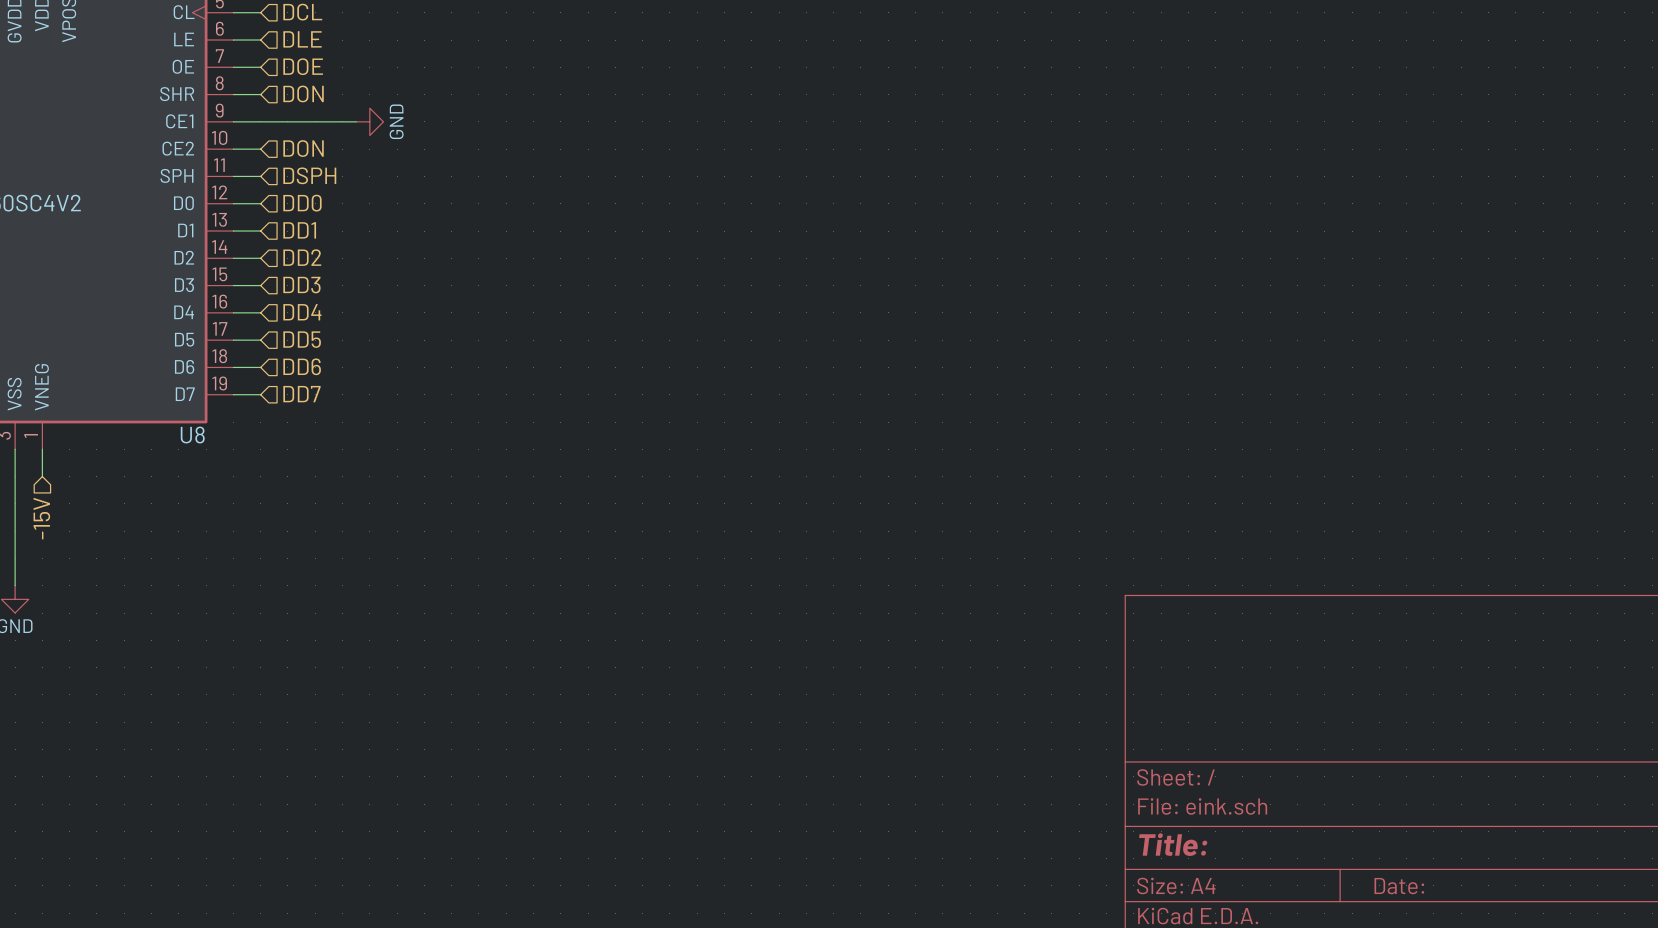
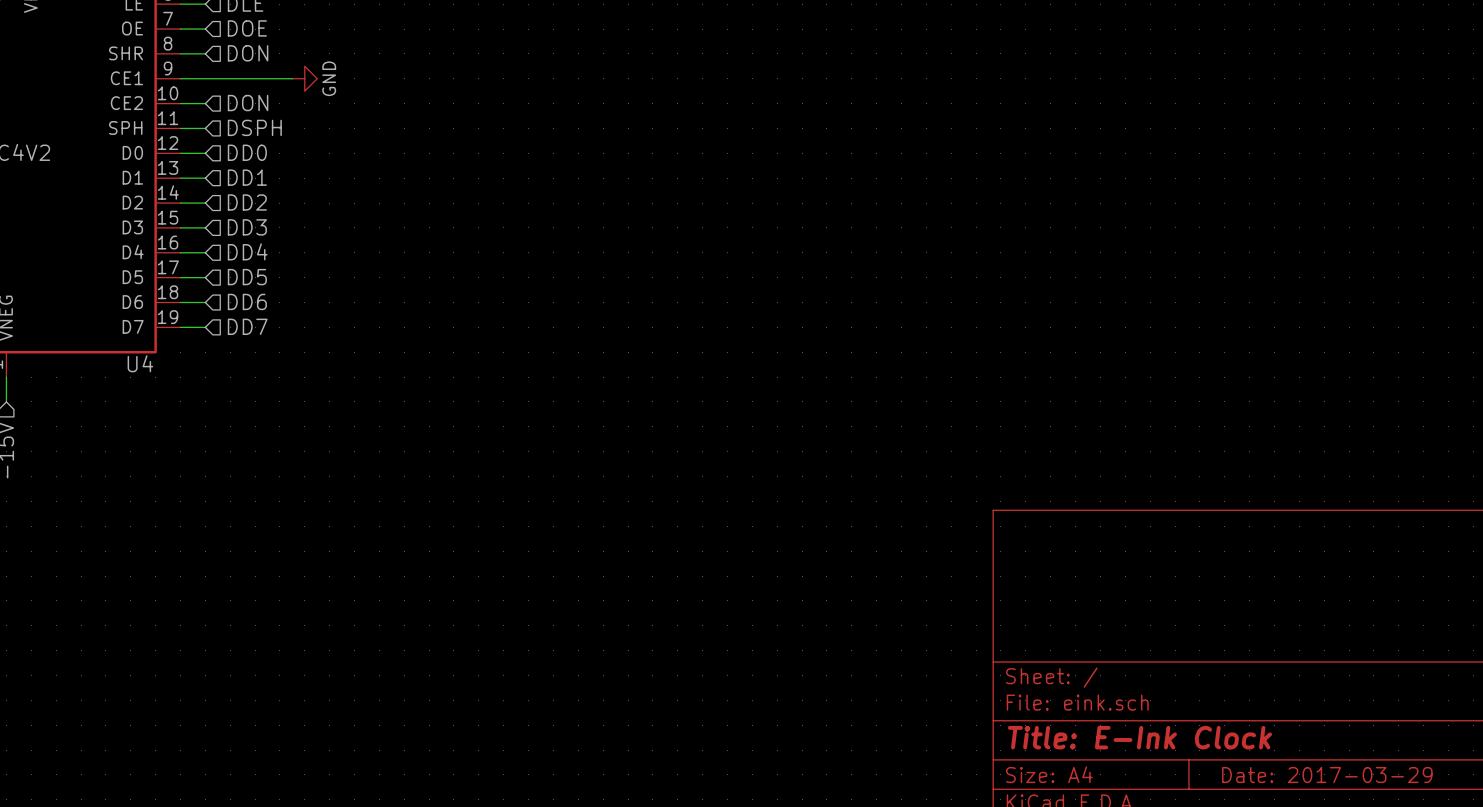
U8 name: U8 (192, 435) -> U4 (140, 363)
title block: Title: (1173, 844) -> Title: E-Ink Clock (1139, 737)
title block: Date: (1399, 886) -> Date: 2017-03-29 (1327, 775)

